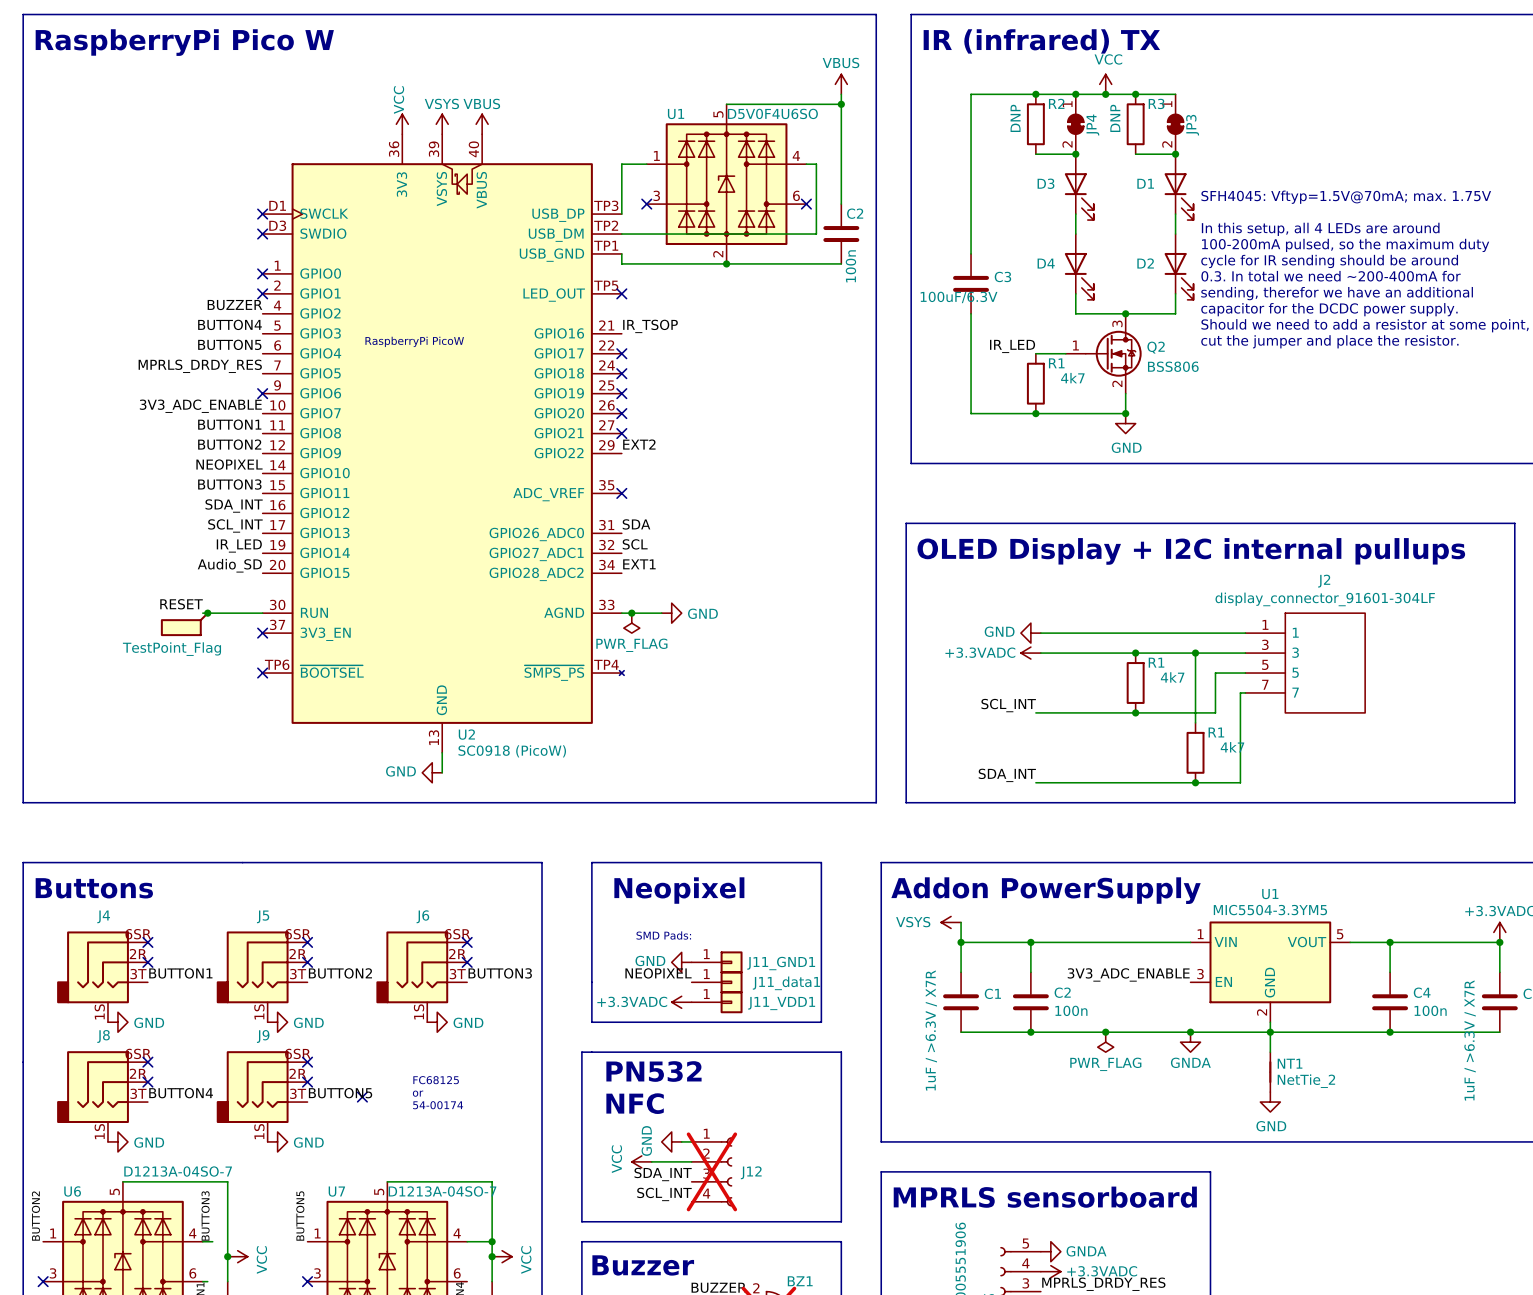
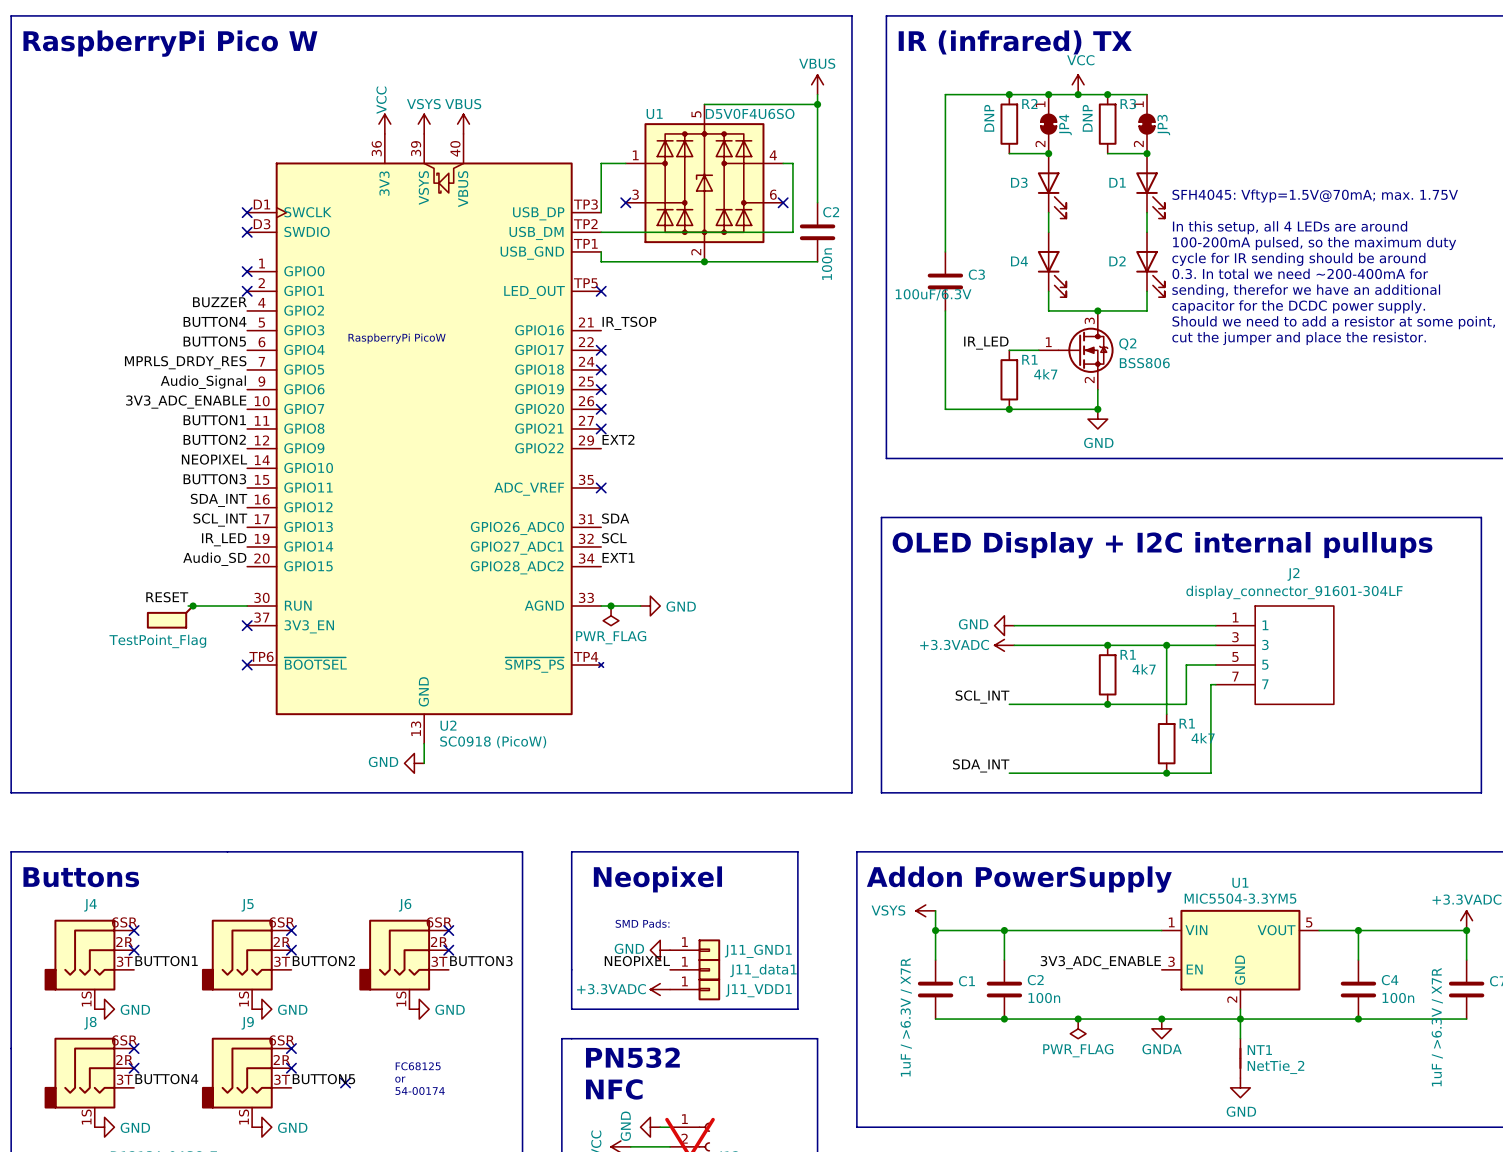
label: none -> Audio_Signal (203, 382)
no-connect mark: (262, 393) -> none

